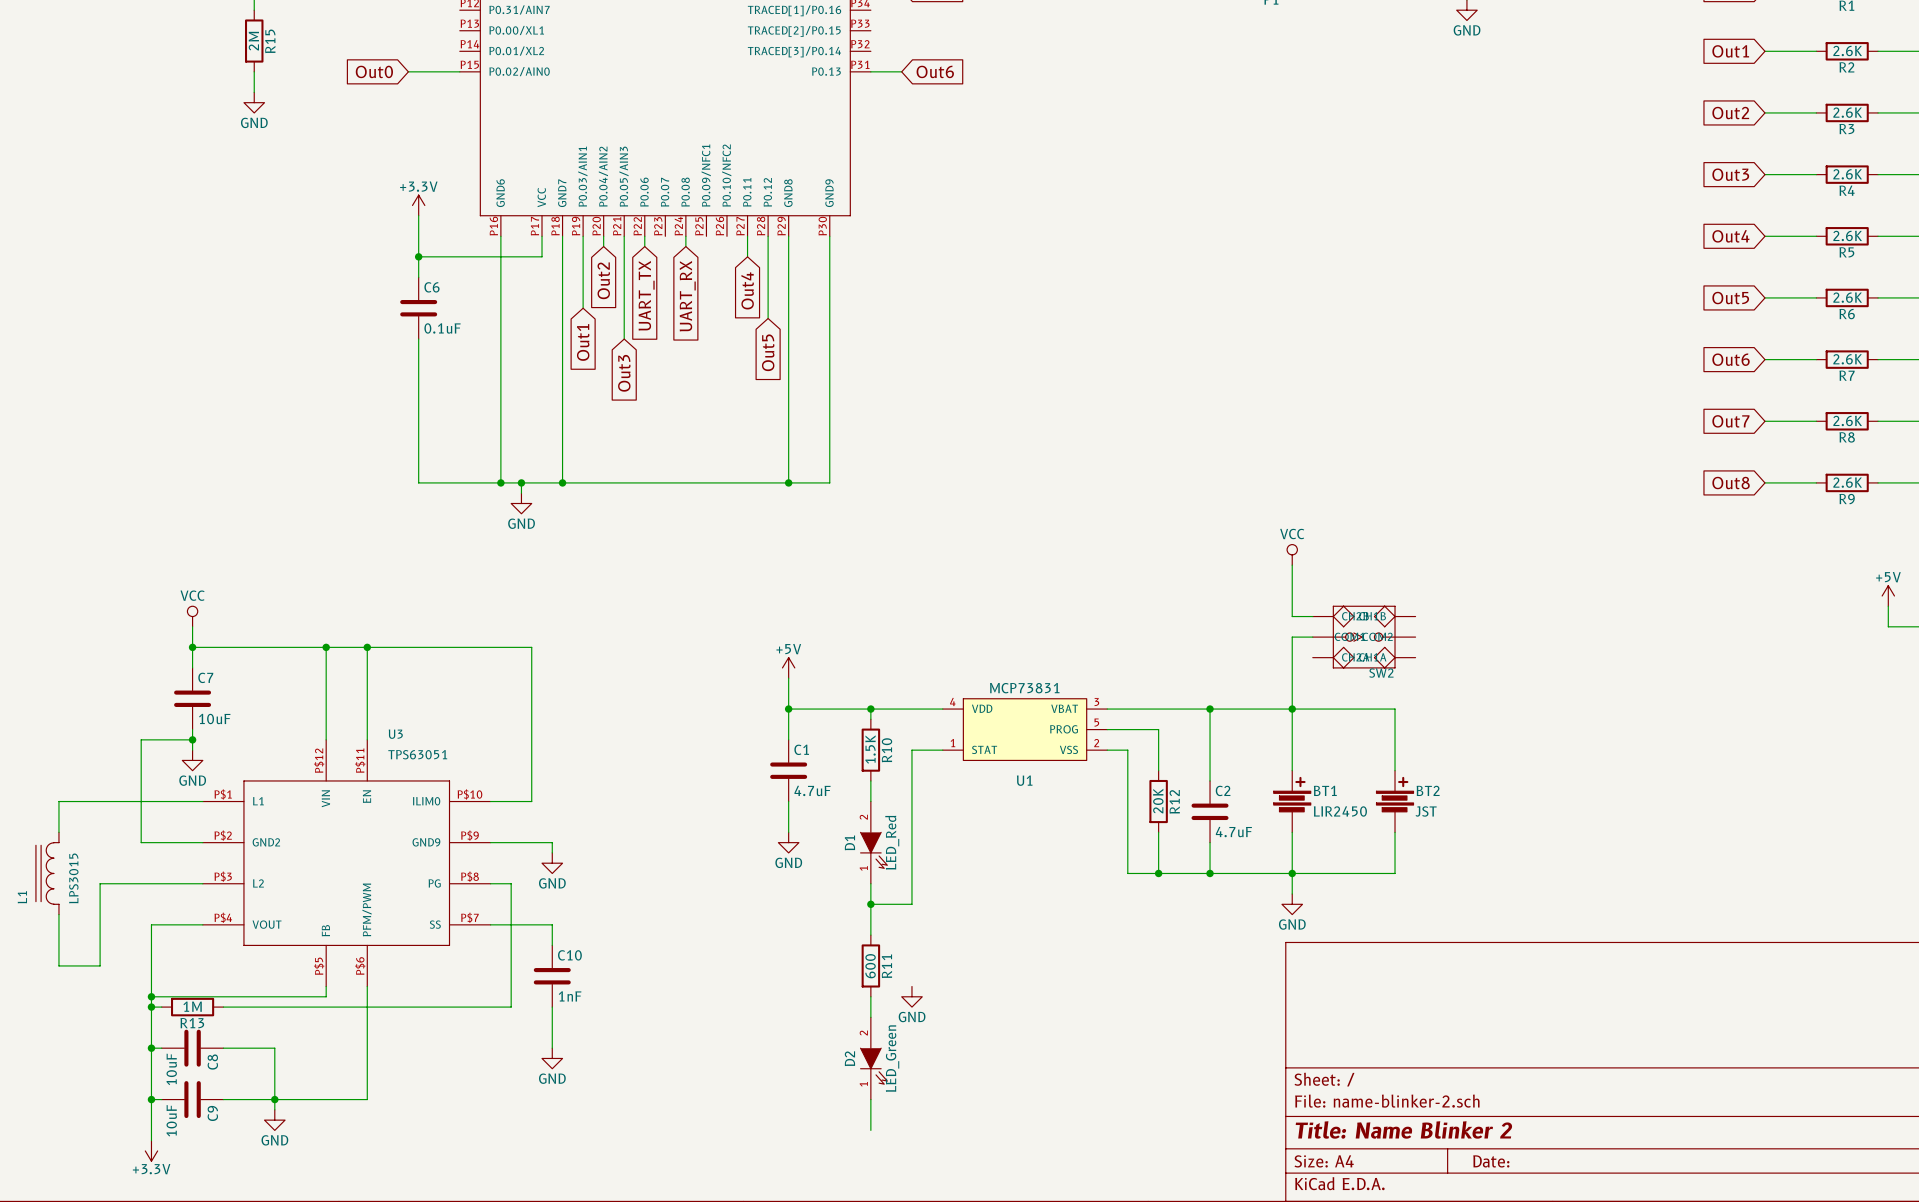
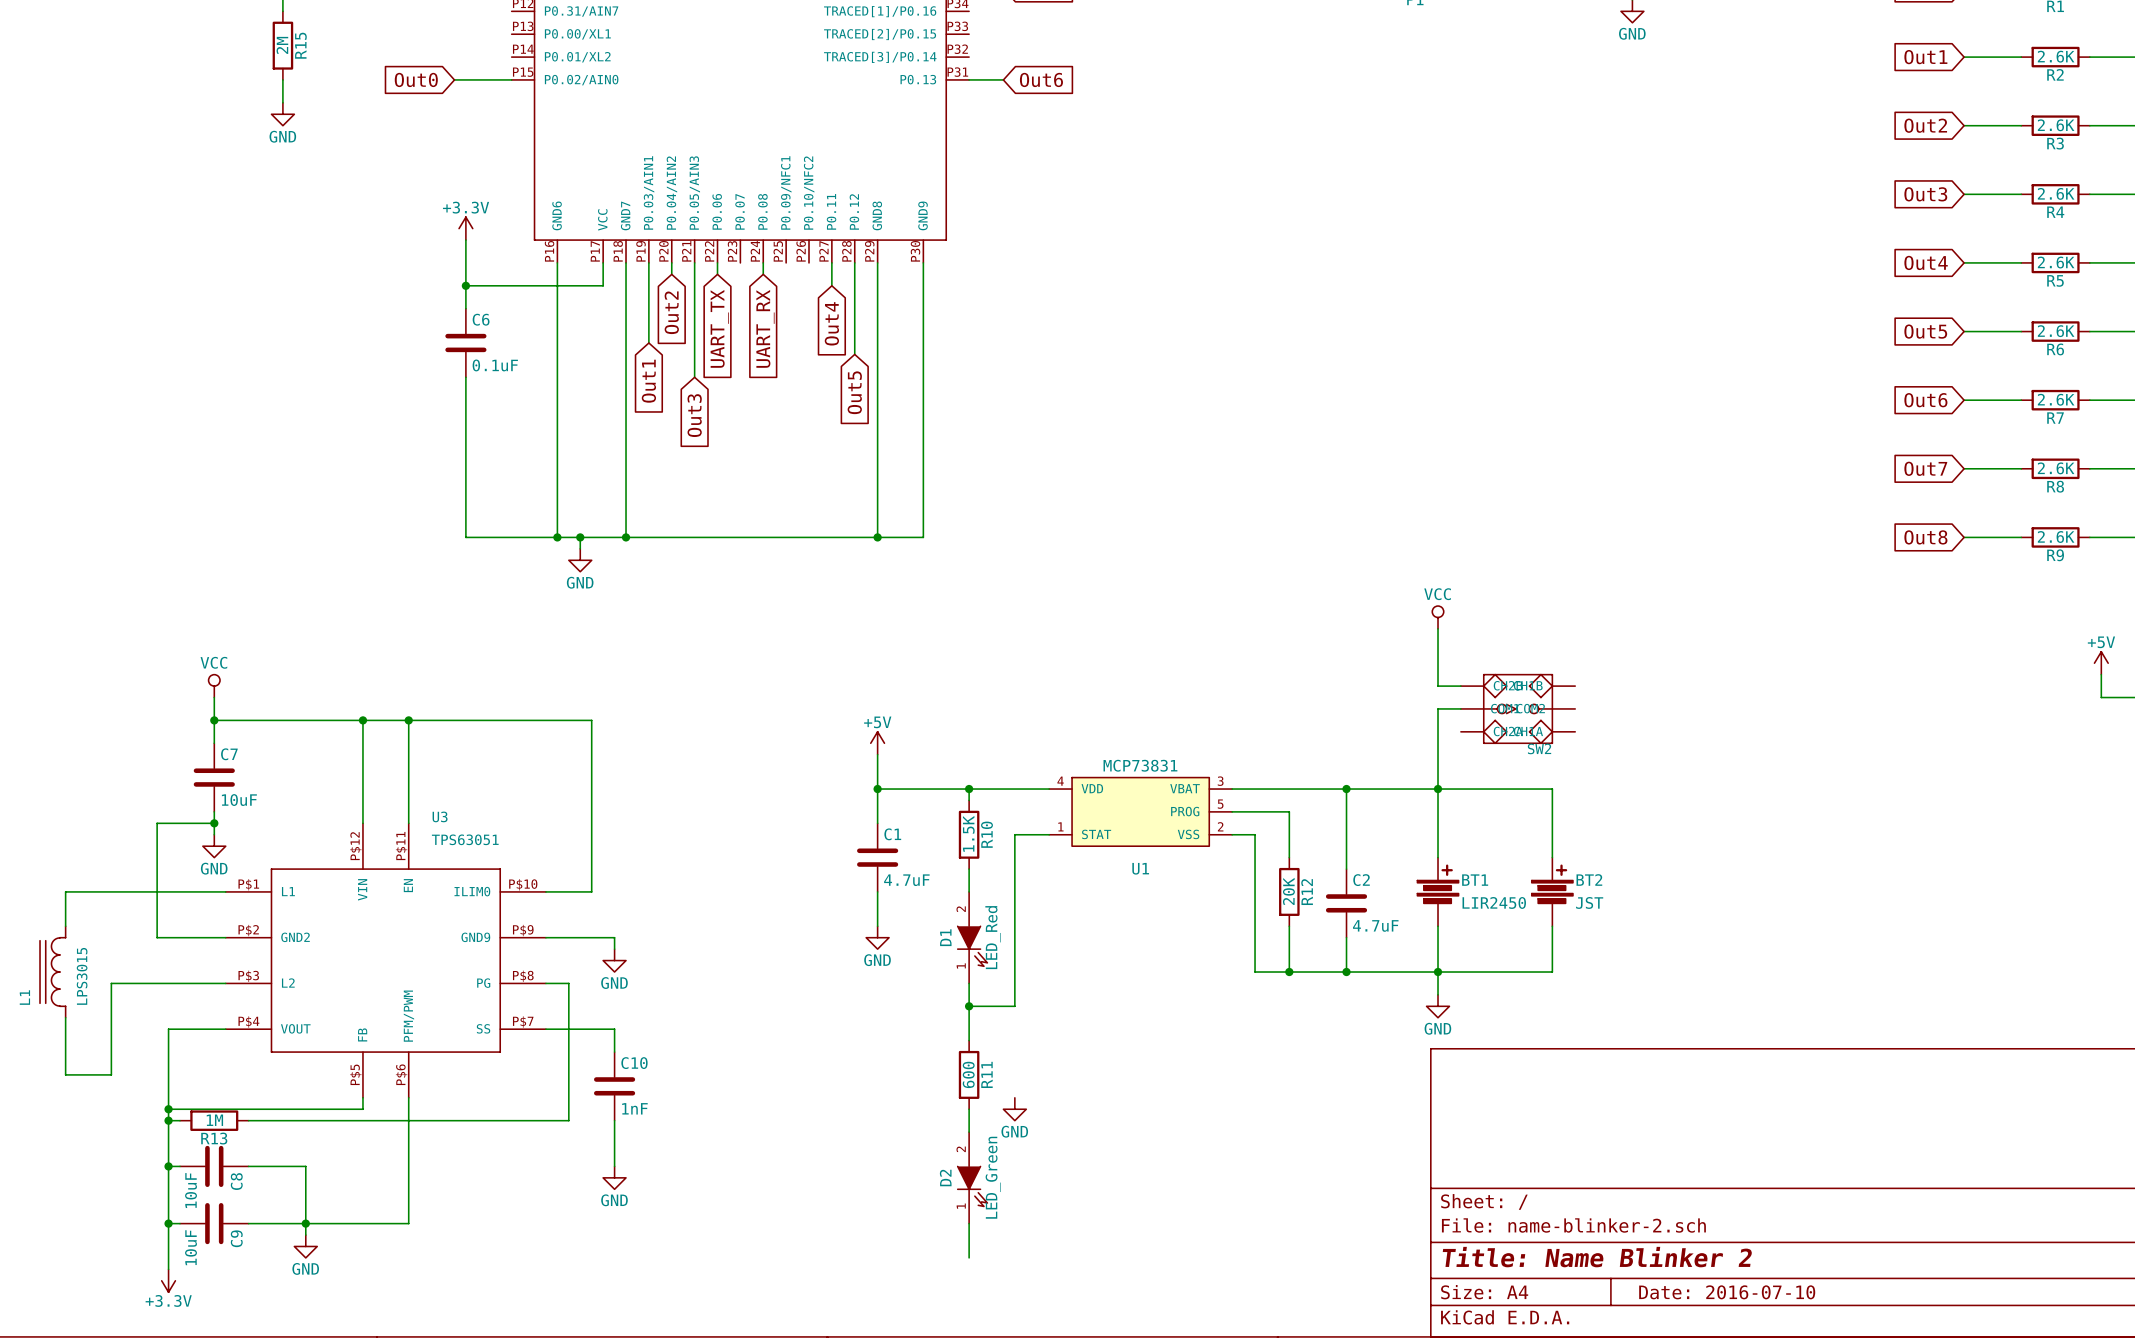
title block: Date: (1491, 1161) -> Date: 2016-07-10 (1727, 1292)

